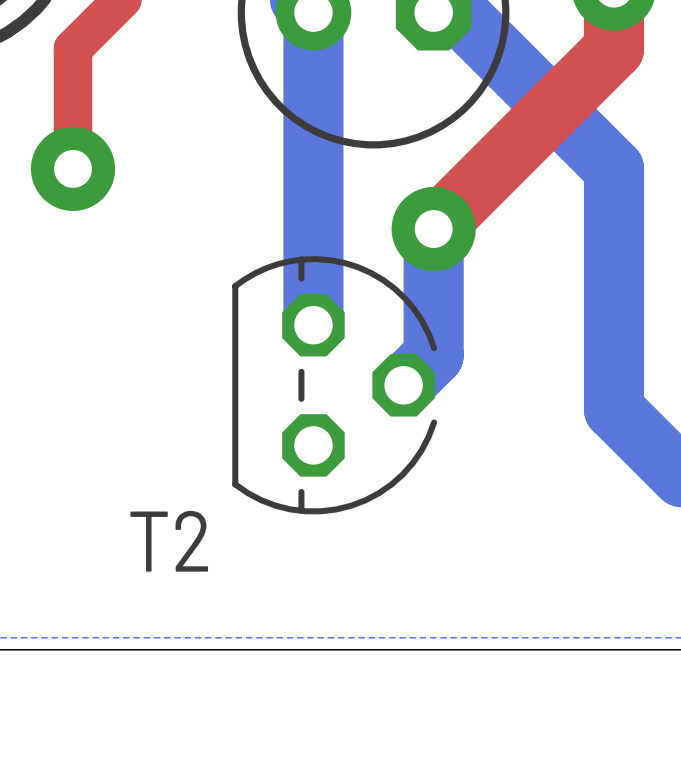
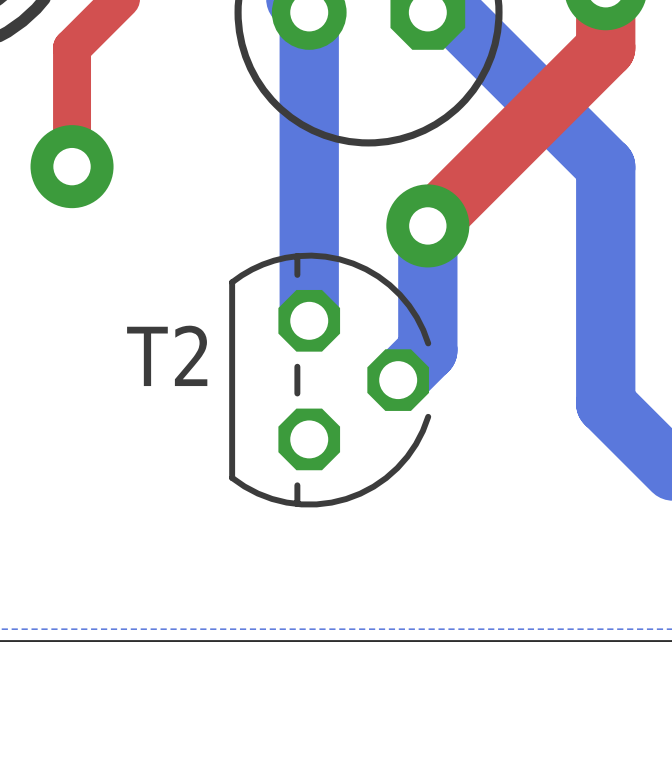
T2 name position: T2 (169, 541) -> T2 (167, 355)

